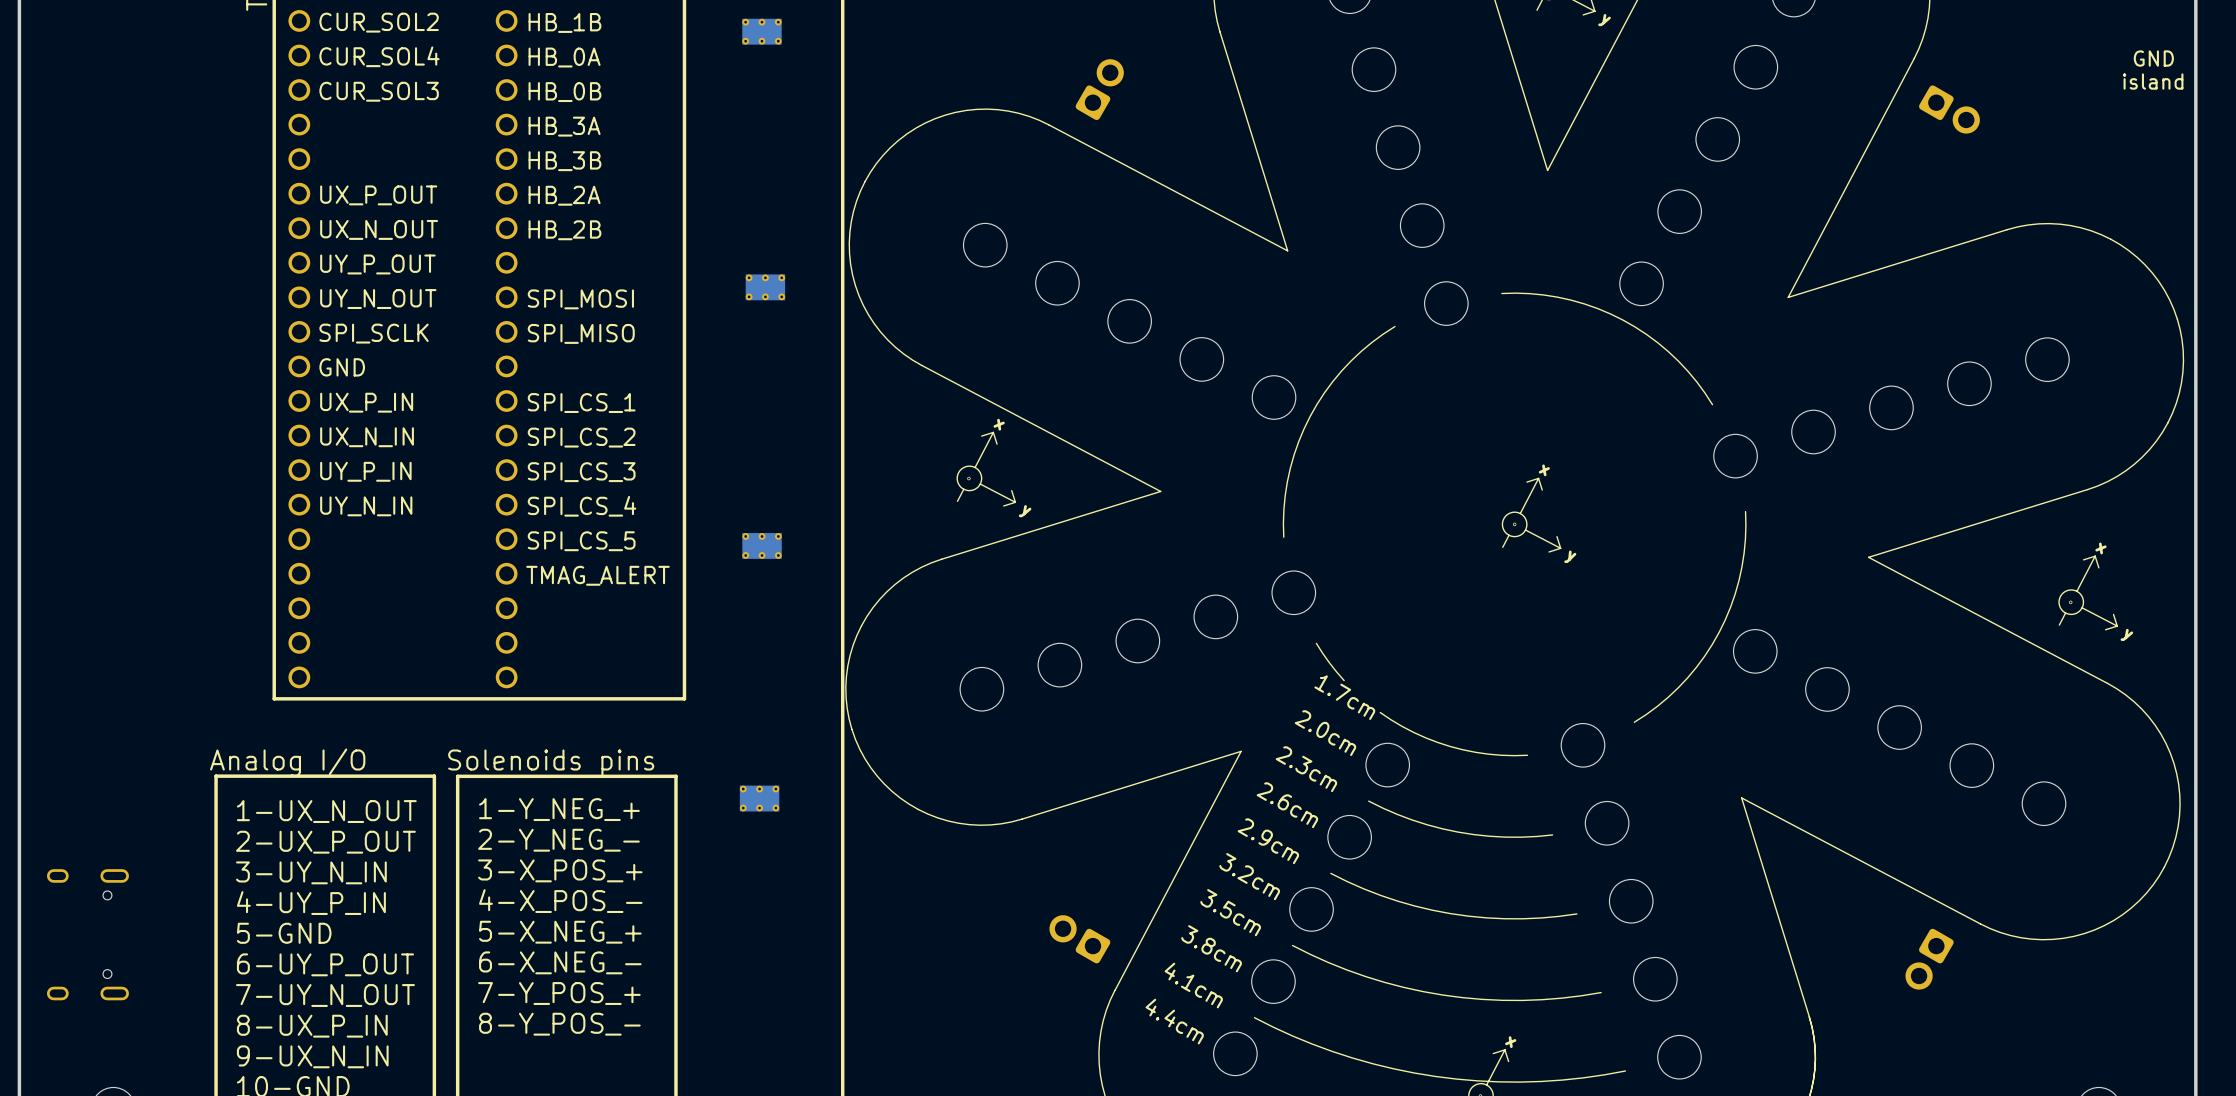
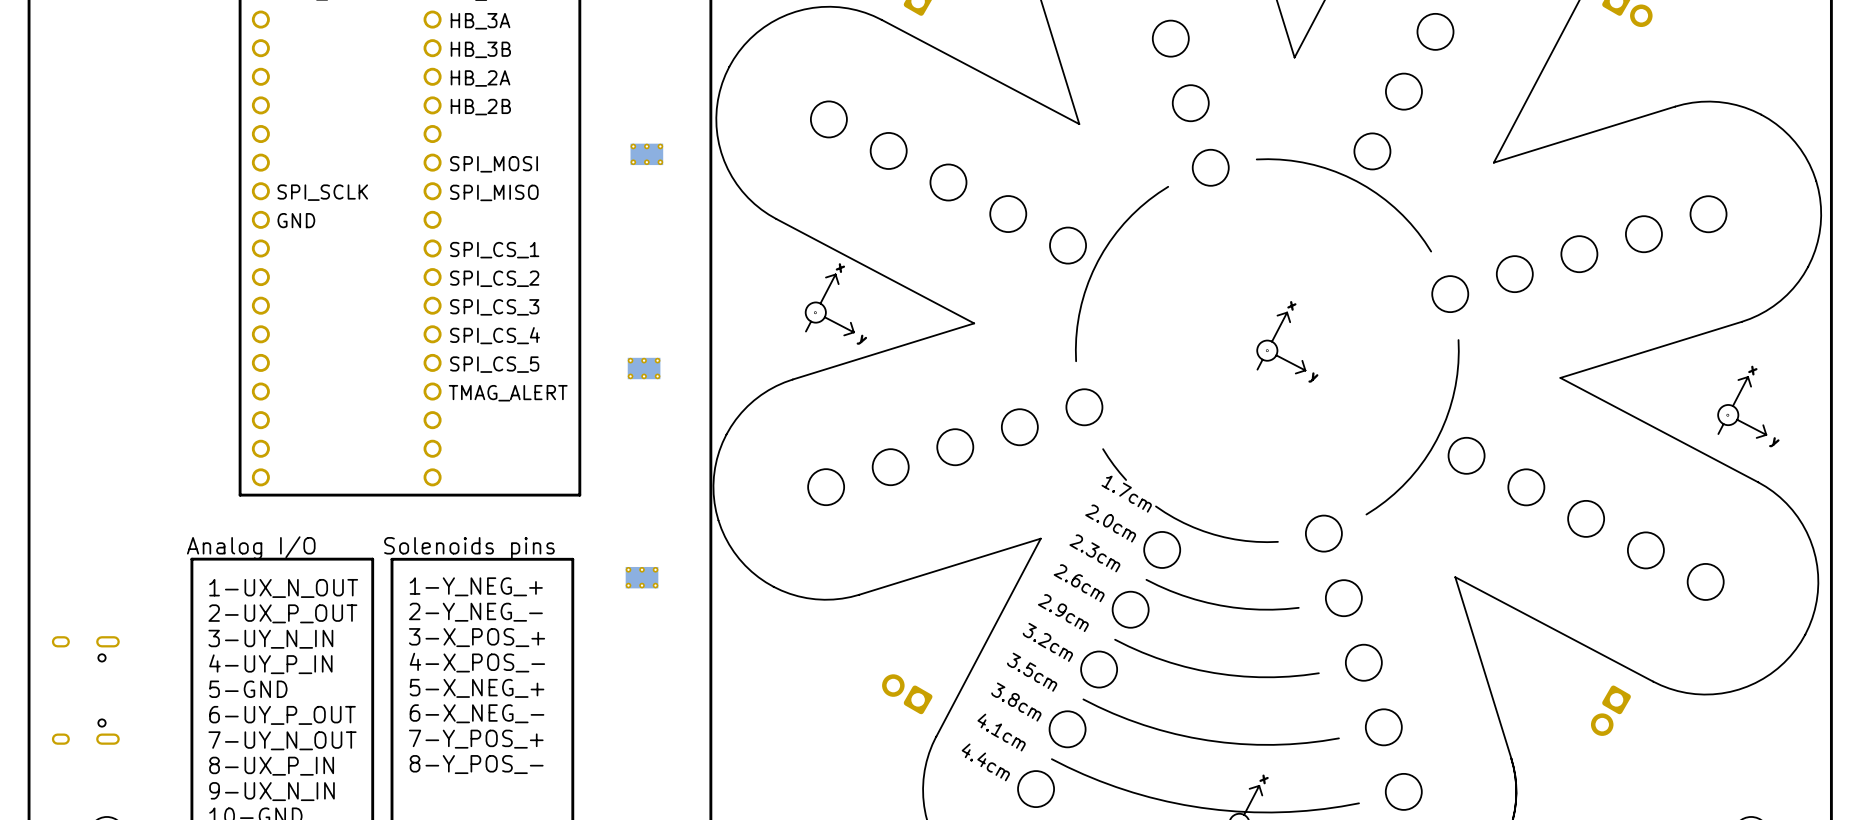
text: UX_P_OUT (378, 195) -> none
text: UX_N_OUT (379, 229) -> none
text: UY_P_OUT (377, 264) -> none
text: UY_N_OUT (378, 299) -> none
text: UX_P_IN (366, 402) -> none
text: UX_N_IN (367, 437) -> none
text: UY_P_IN (365, 471) -> none
text: UY_N_IN (366, 506) -> none

